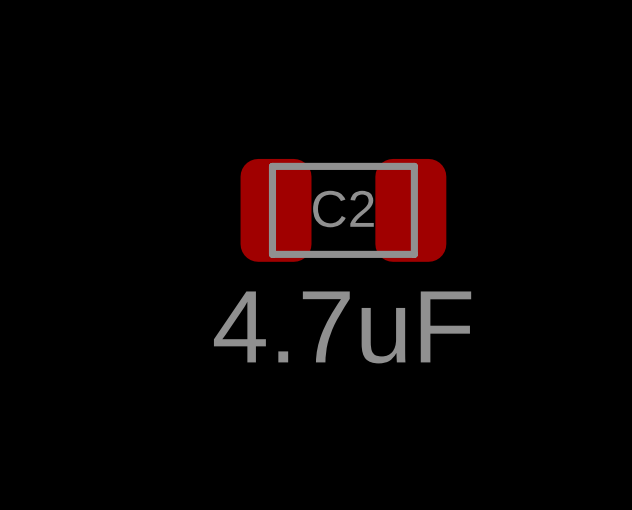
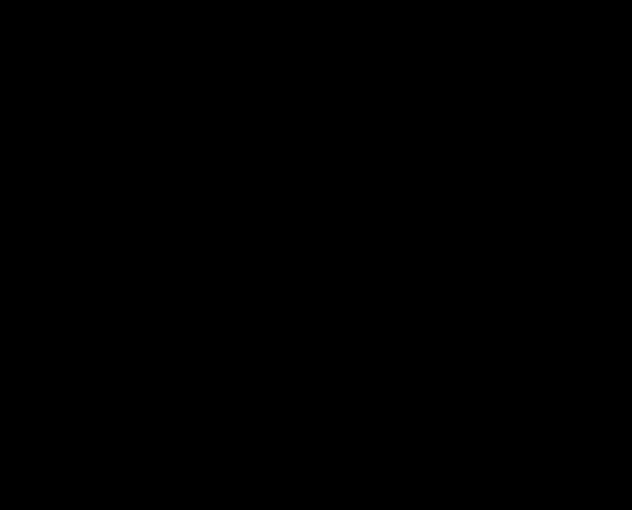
C2: 4.7uF (343, 210) -> none

